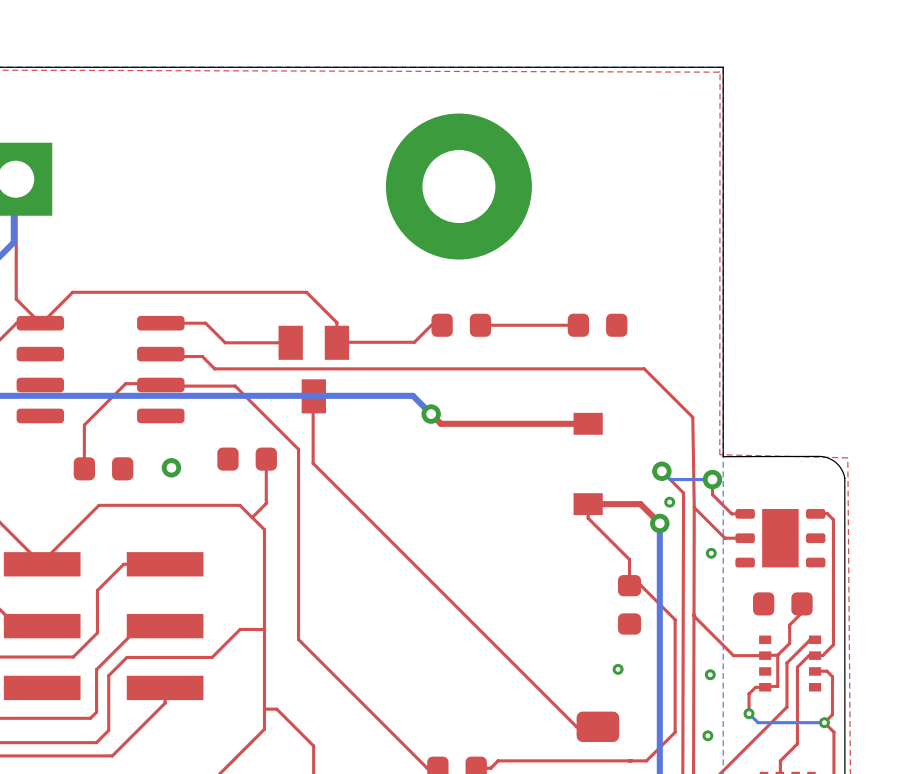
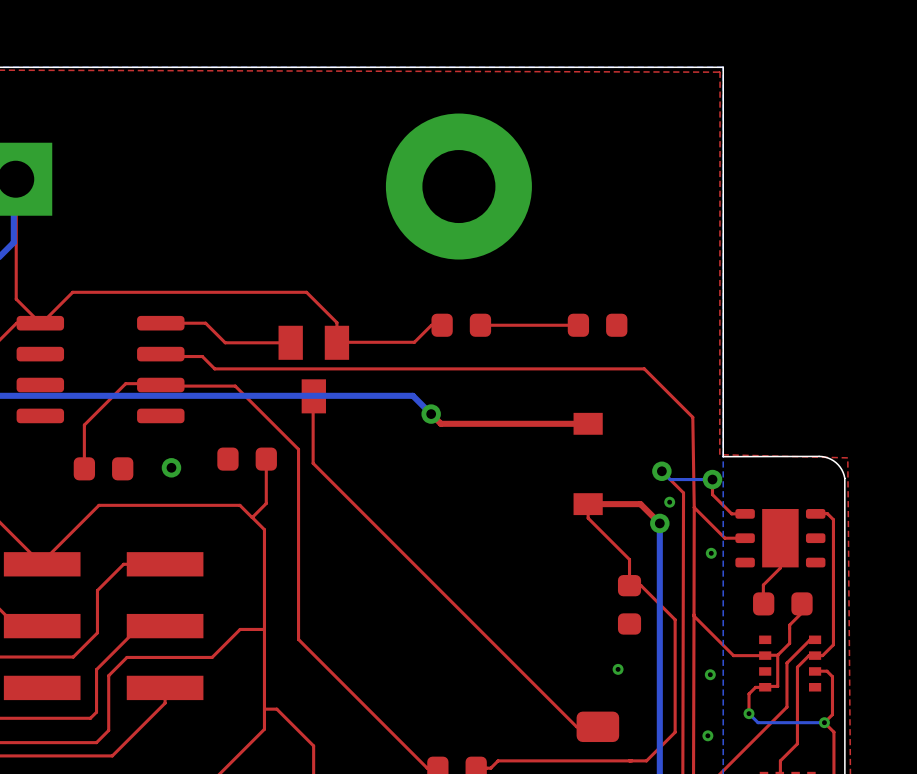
top track: none -> (780, 538) (780, 568) (763, 585) (763, 603)

